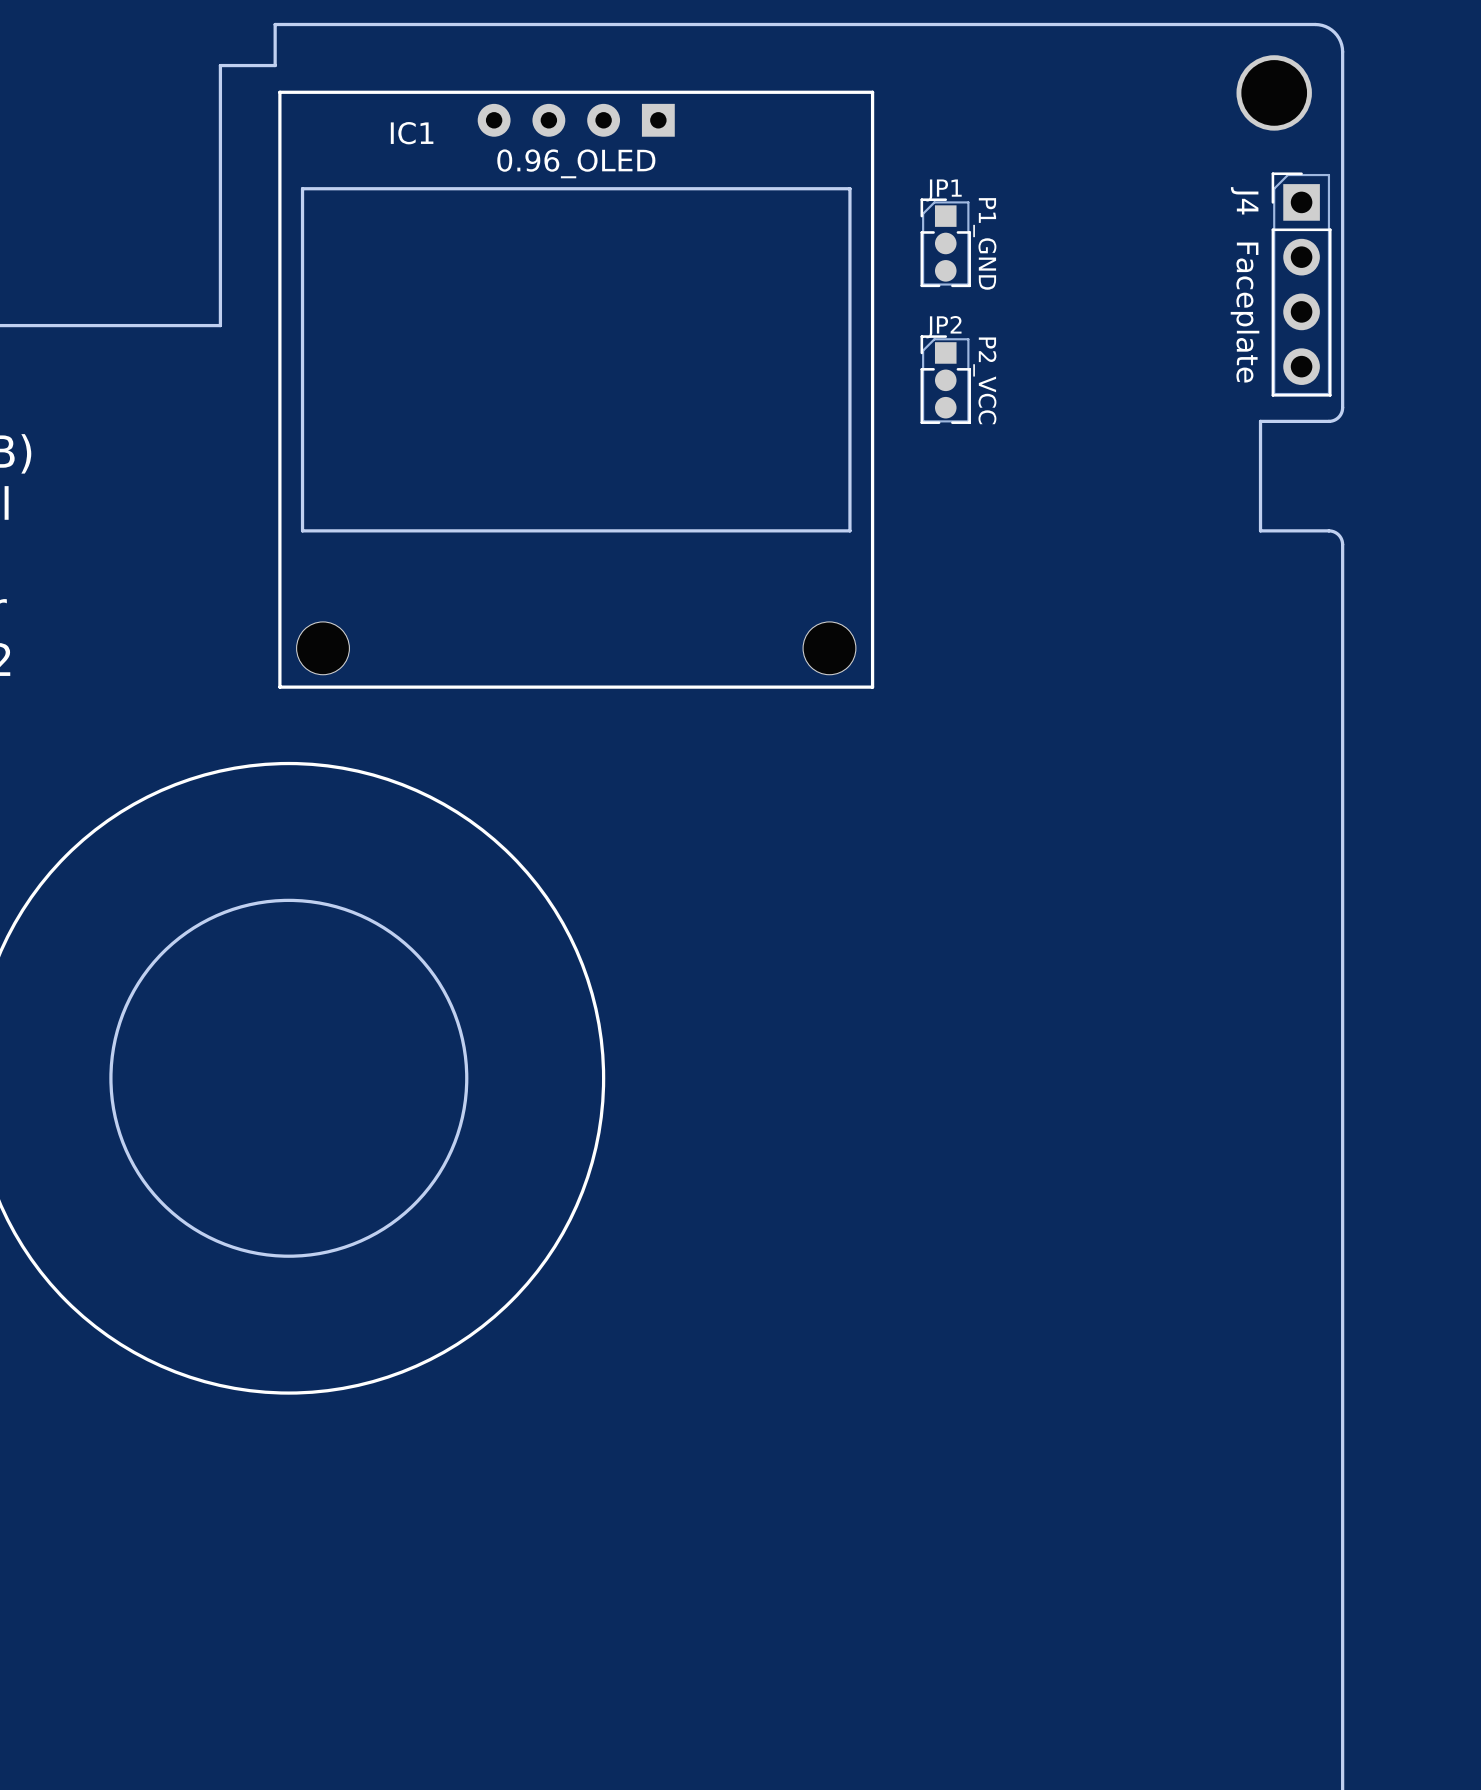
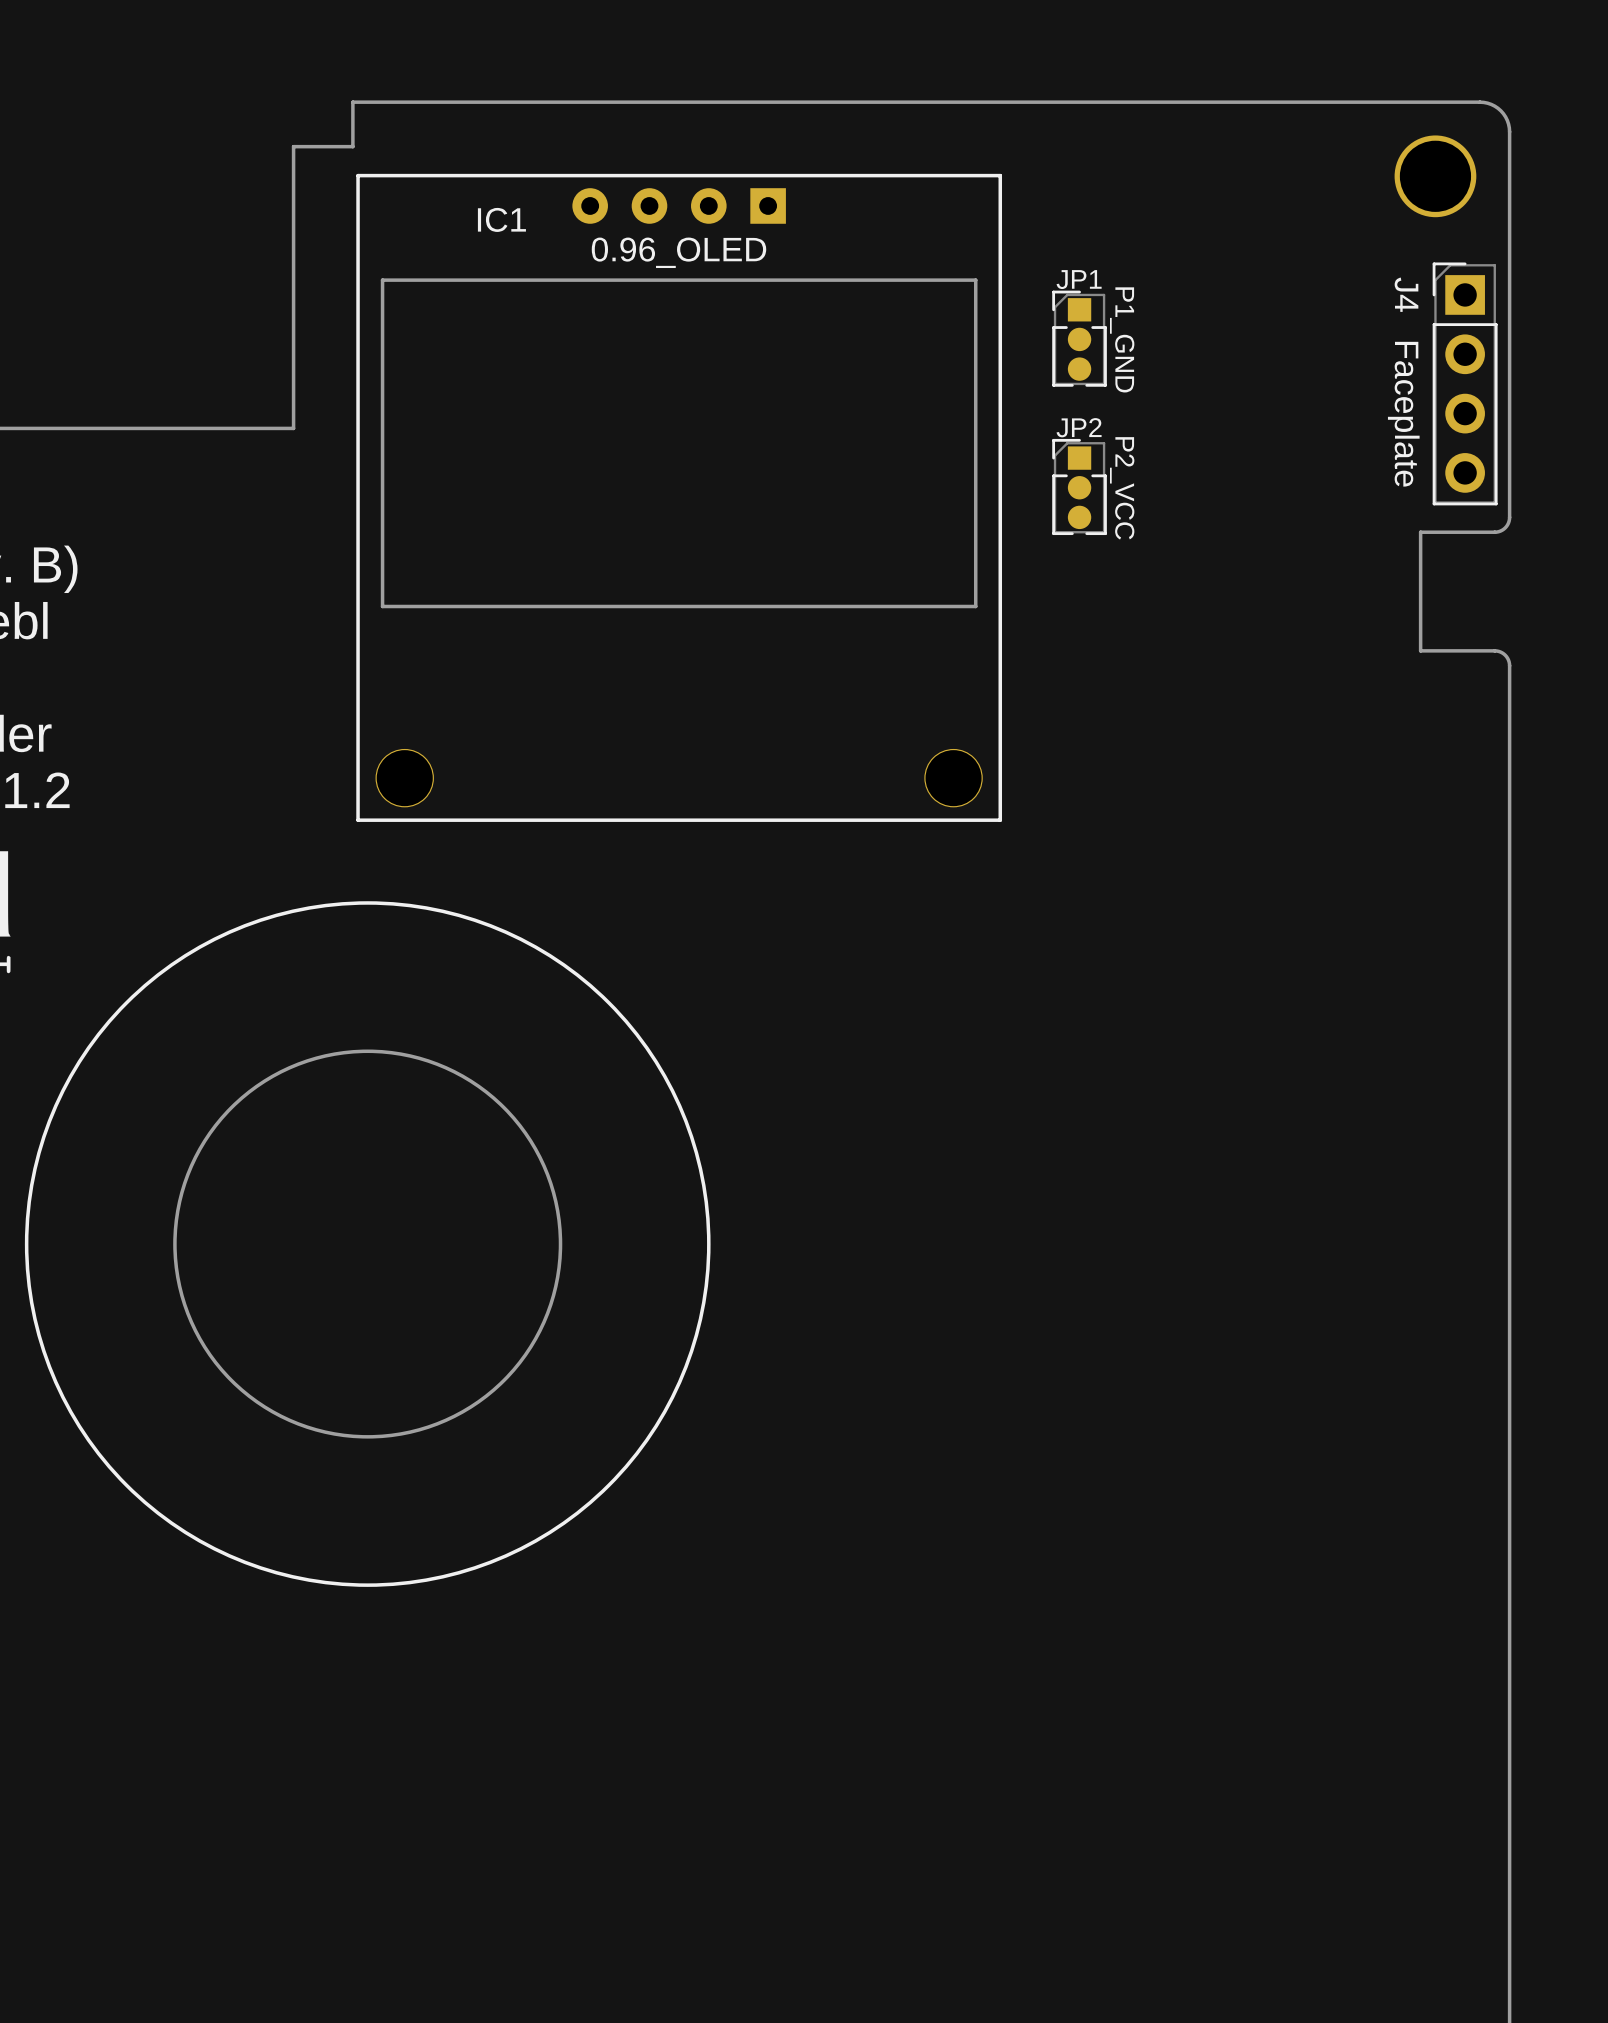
board edge: (849, 489) (849, 530) (302, 530) (302, 489) -> (975, 606) (382, 606)

